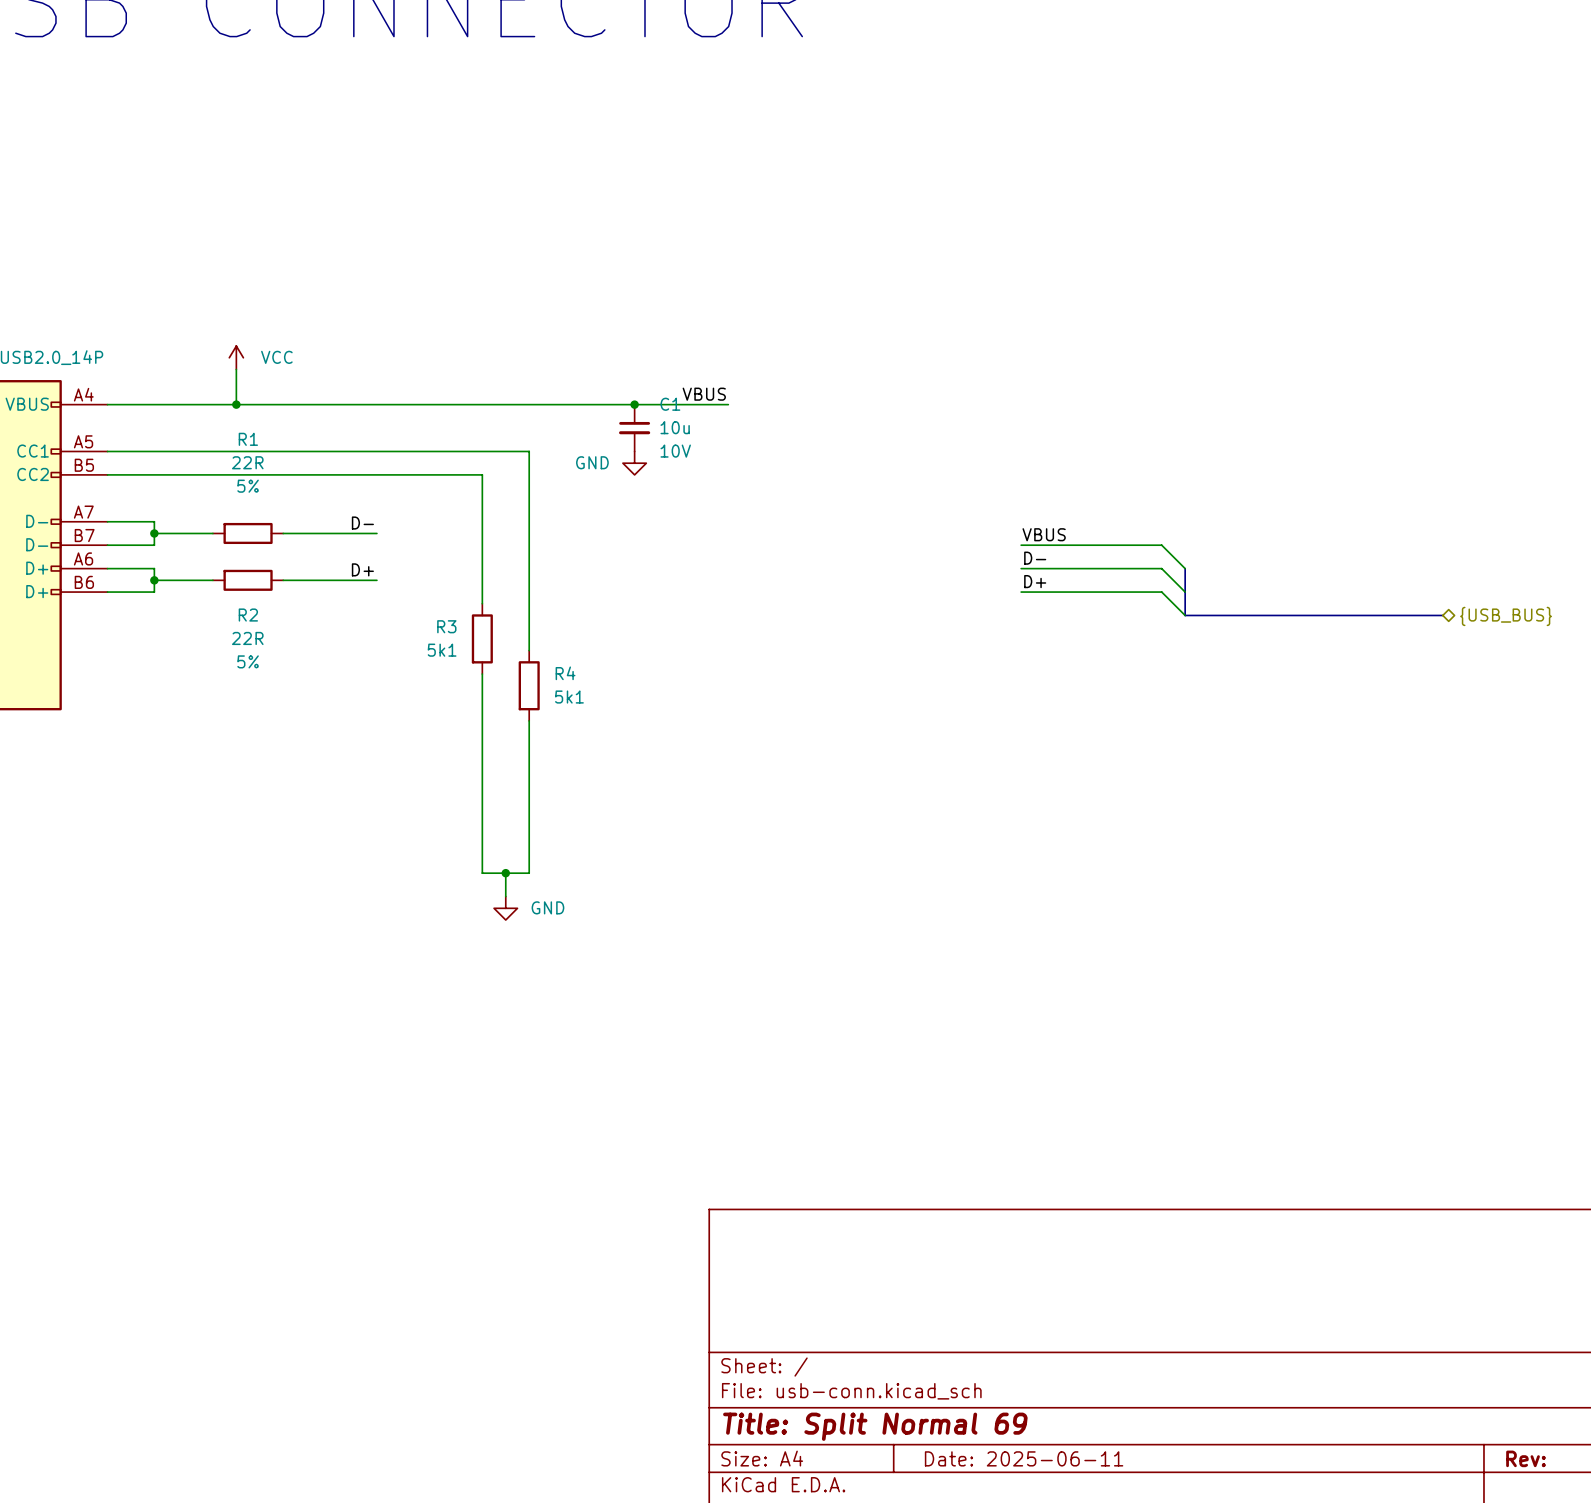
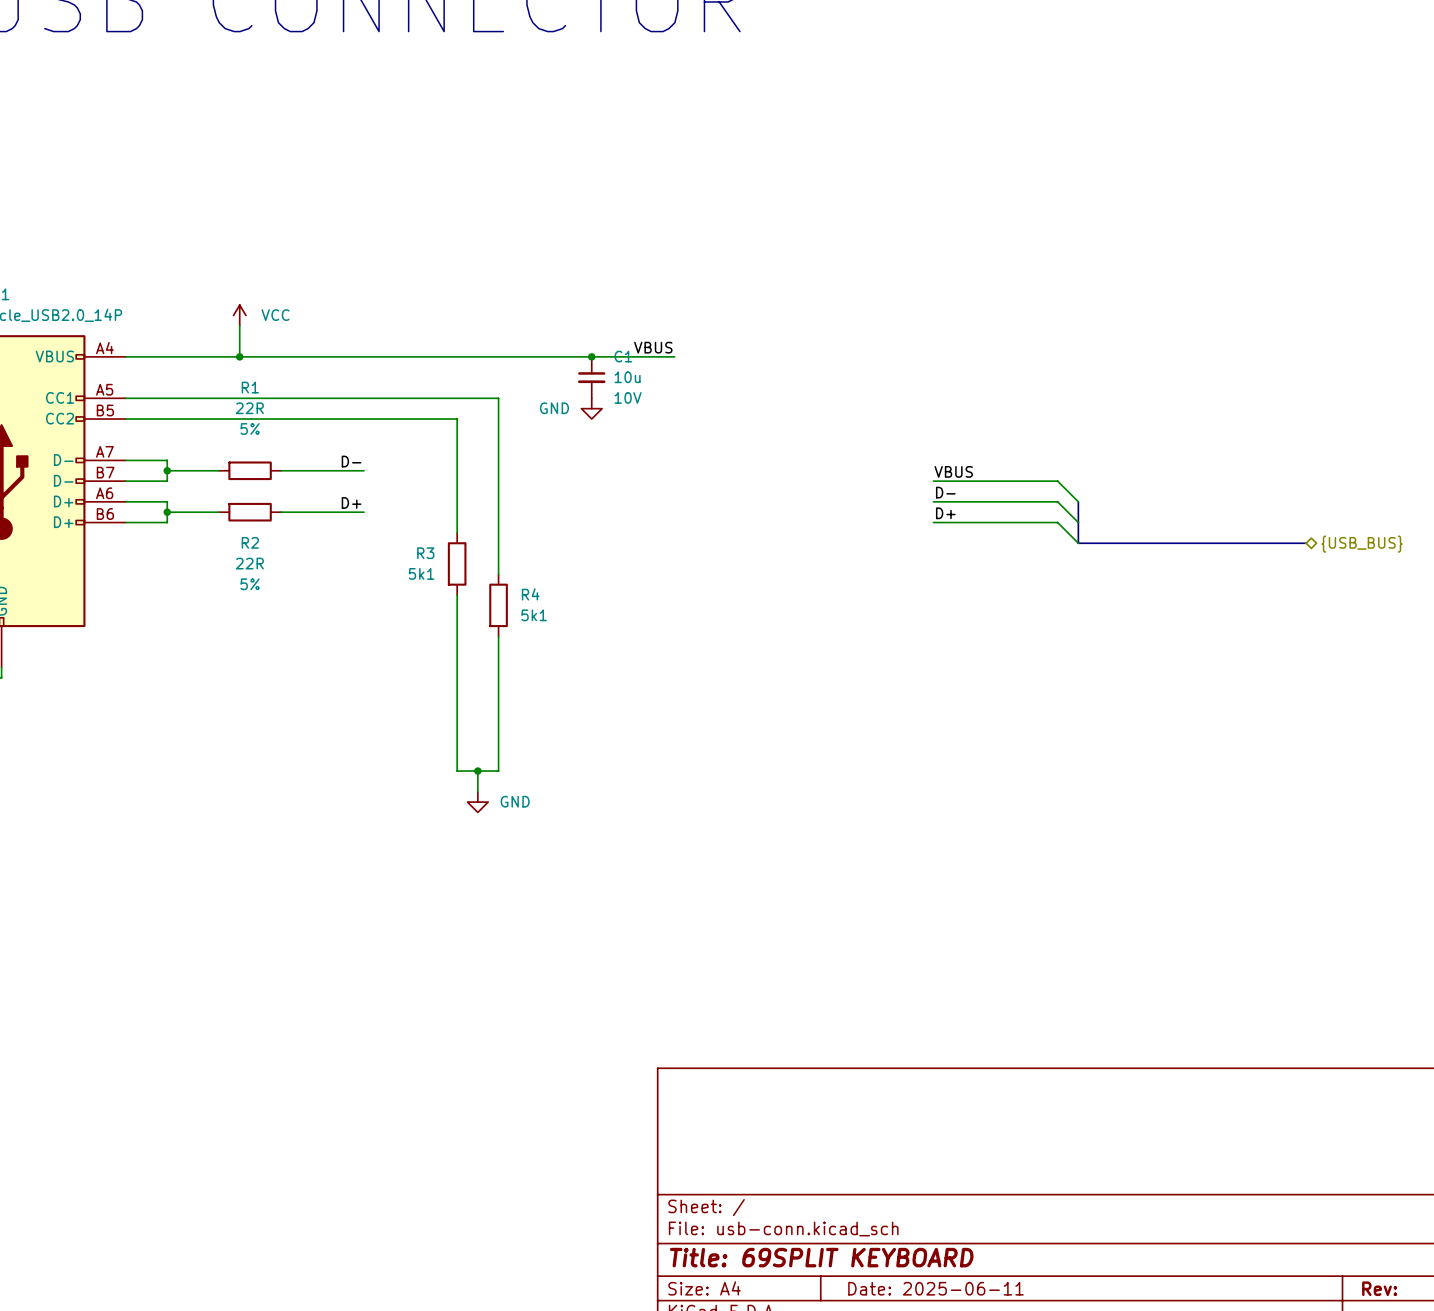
title block: Title: Split Normal 69 (875, 1426) -> Title: 69SPLIT KEYBOARD (821, 1257)

